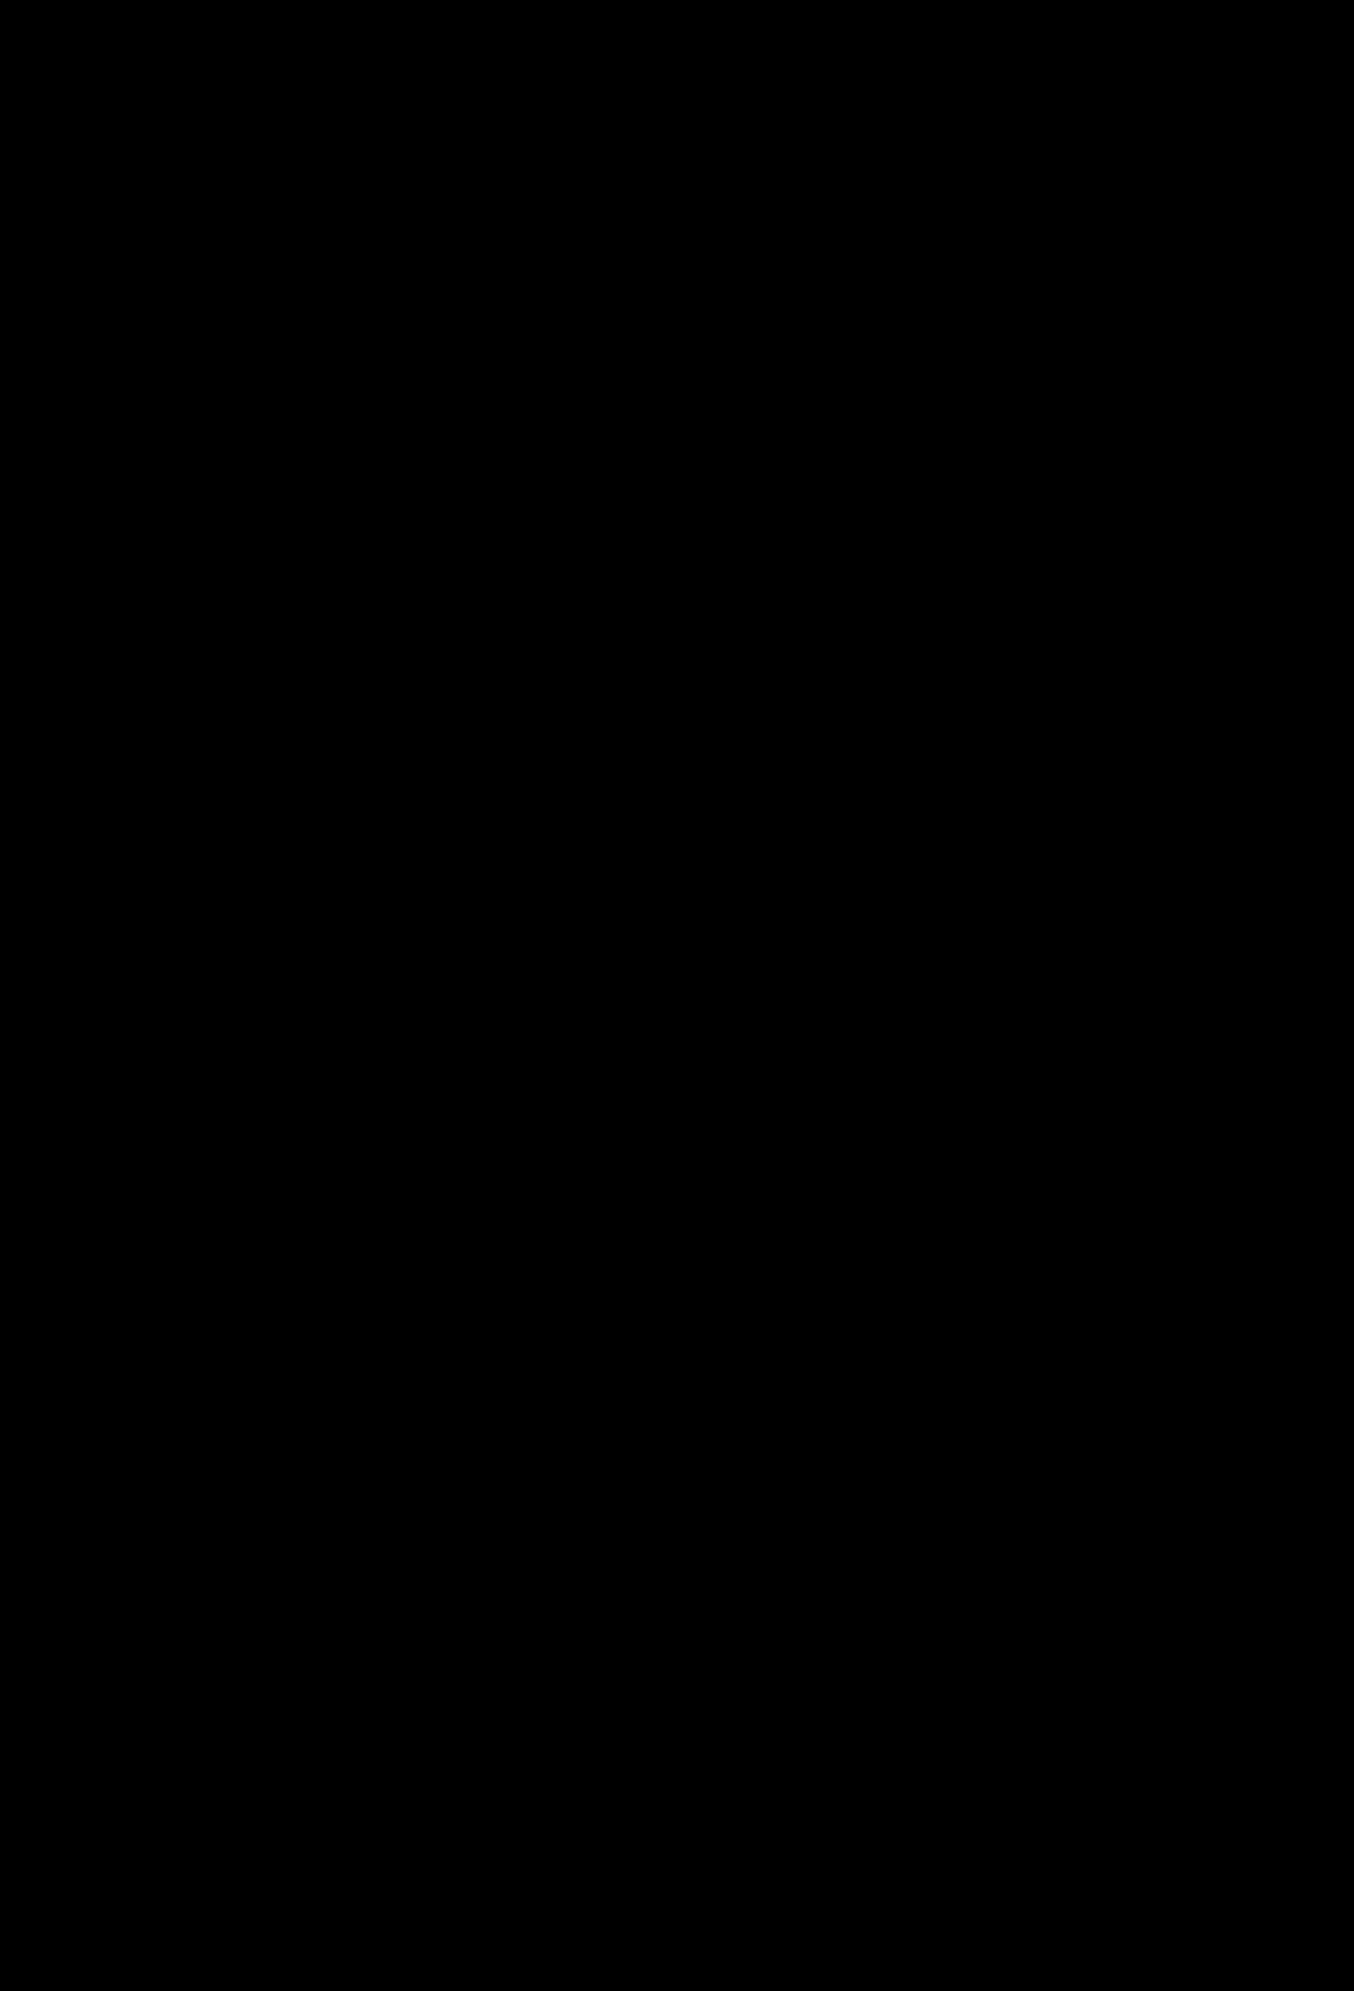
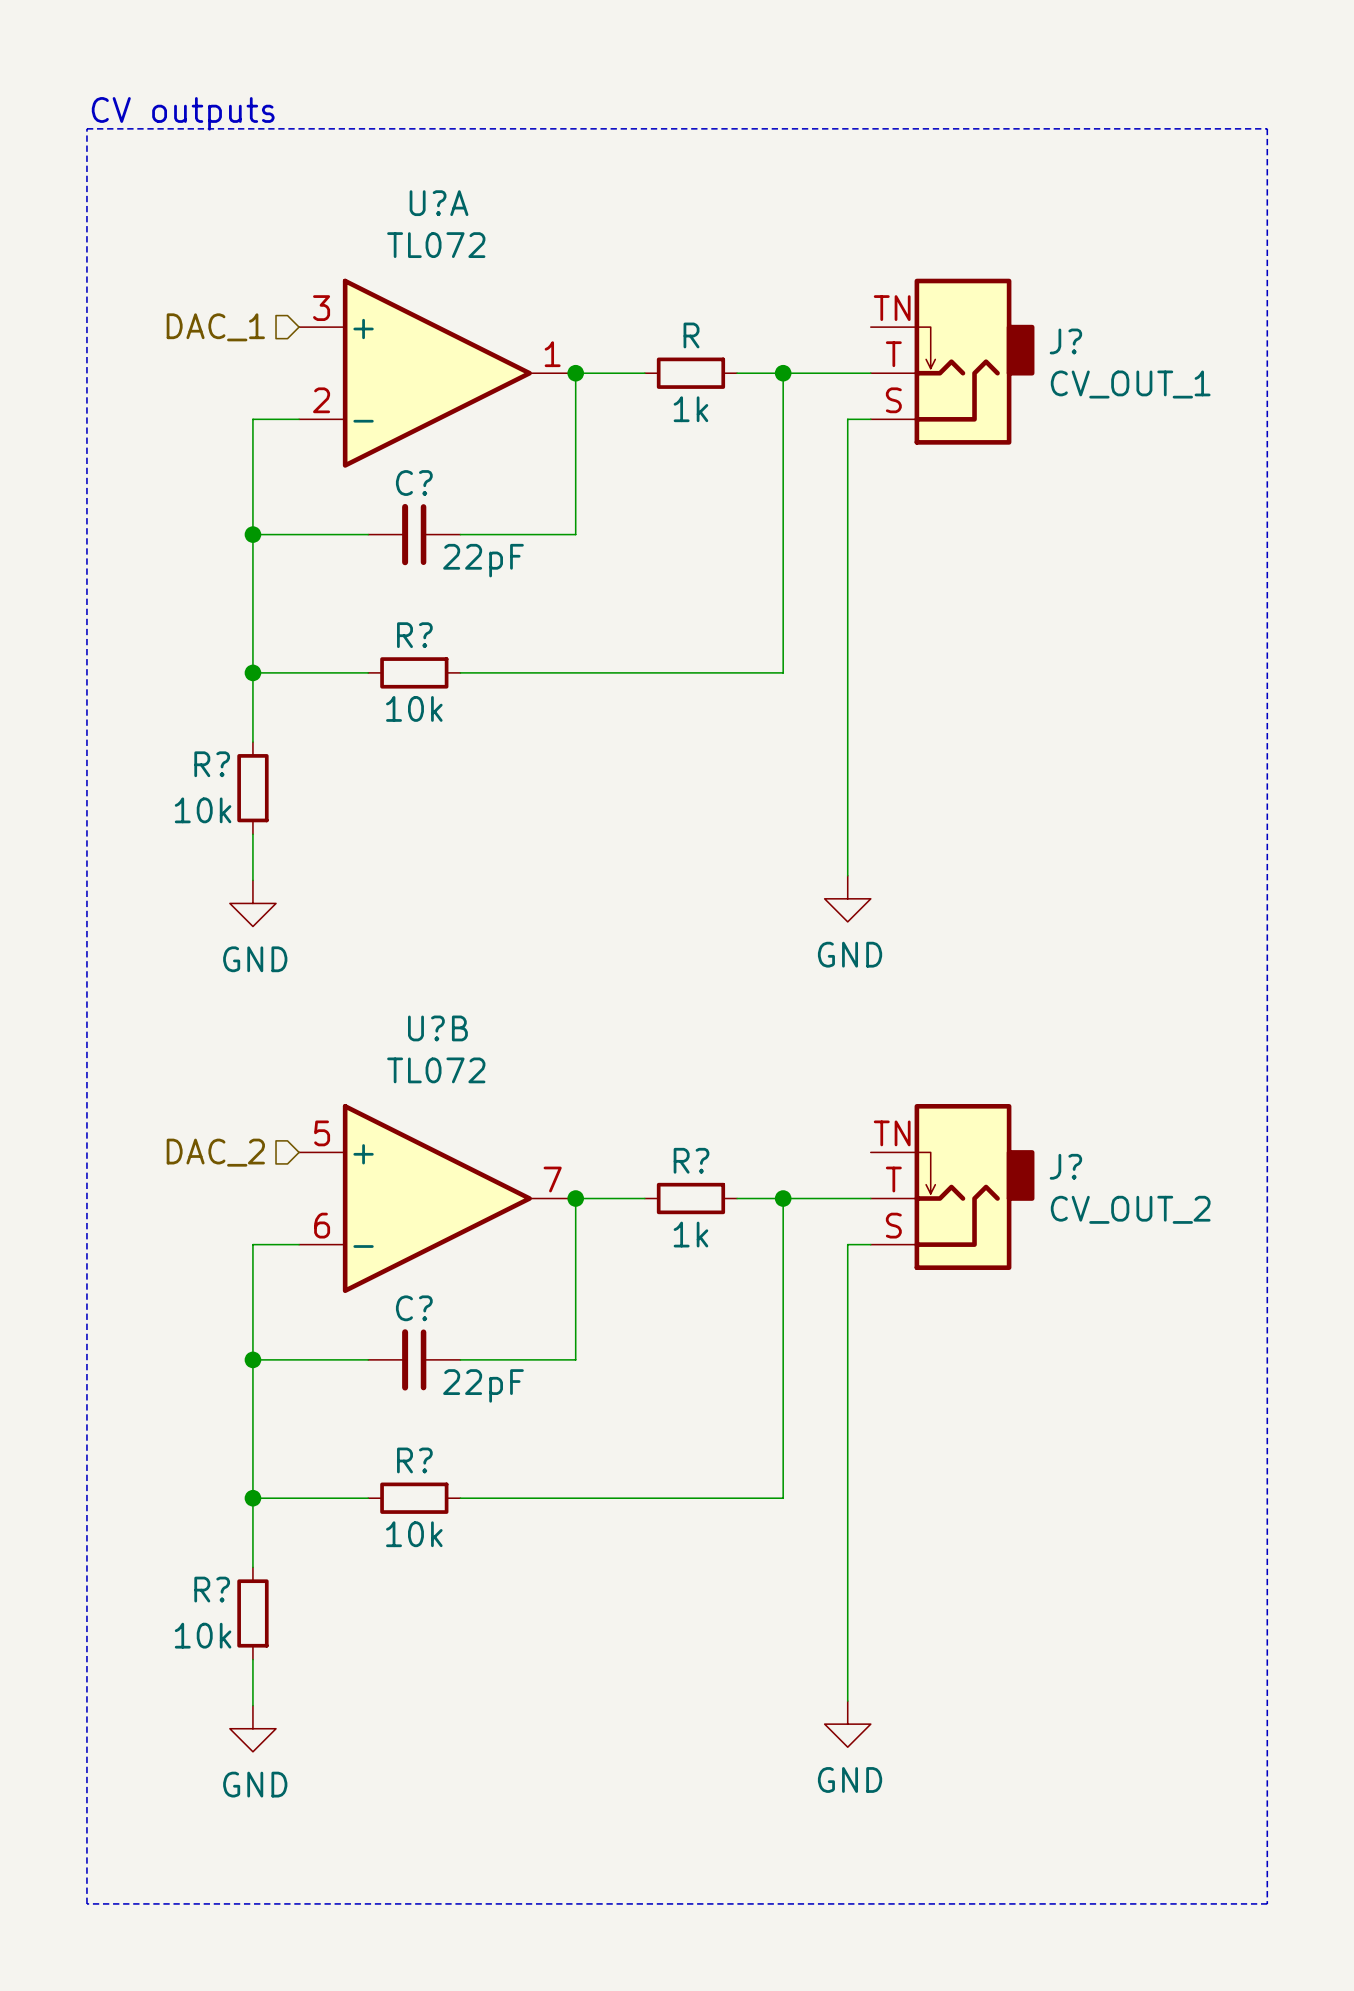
text: none -> CV outputs (183, 113)
line: none -> (86, 128) (1267, 128) (1267, 1903) (86, 1903) (86, 128)
hierarchical label: none -> DAC_1 (215, 327)
J?: none -> CV_OUT_1 (952, 361)
U?A: none -> TL072 (437, 373)
junction: none -> (575, 373)
wire: none -> (644, 373) (575, 373) (575, 534) (460, 534)
R: none -> 1k (690, 373)
wire: none -> (737, 373) (870, 373)
wire: none -> (783, 373) (783, 672) (460, 672)
junction: none -> (783, 373)
wire: none -> (299, 419) (252, 419) (252, 742)
wire: none -> (870, 419) (847, 419) (847, 875)
wire: none -> (252, 534) (368, 534)
junction: none -> (252, 534)
C?: none -> 22pF (414, 534)
wire: none -> (252, 672) (368, 672)
junction: none -> (252, 672)
R?: none -> 10k (414, 672)
R?: none -> 10k (252, 788)
wire: none -> (252, 834) (252, 880)
power symbol: none -> GND (847, 898)
power symbol: none -> GND (252, 903)
hierarchical label: none -> DAC_2 (215, 1152)
J?: none -> CV_OUT_2 (952, 1186)
U?B: none -> TL072 (437, 1198)
junction: none -> (575, 1198)
wire: none -> (644, 1198) (575, 1198) (575, 1359) (460, 1359)
R?: none -> 1k (690, 1198)
wire: none -> (737, 1198) (870, 1198)
wire: none -> (783, 1198) (783, 1498) (460, 1498)
junction: none -> (783, 1198)
wire: none -> (299, 1244) (252, 1244) (252, 1567)
wire: none -> (870, 1244) (847, 1244) (847, 1701)
wire: none -> (252, 1359) (368, 1359)
junction: none -> (252, 1359)
C?: none -> 22pF (414, 1359)
wire: none -> (252, 1498) (368, 1498)
junction: none -> (252, 1498)
R?: none -> 10k (414, 1498)
R?: none -> 10k (252, 1613)
wire: none -> (252, 1659) (252, 1705)
power symbol: none -> GND (847, 1724)
power symbol: none -> GND (252, 1728)

